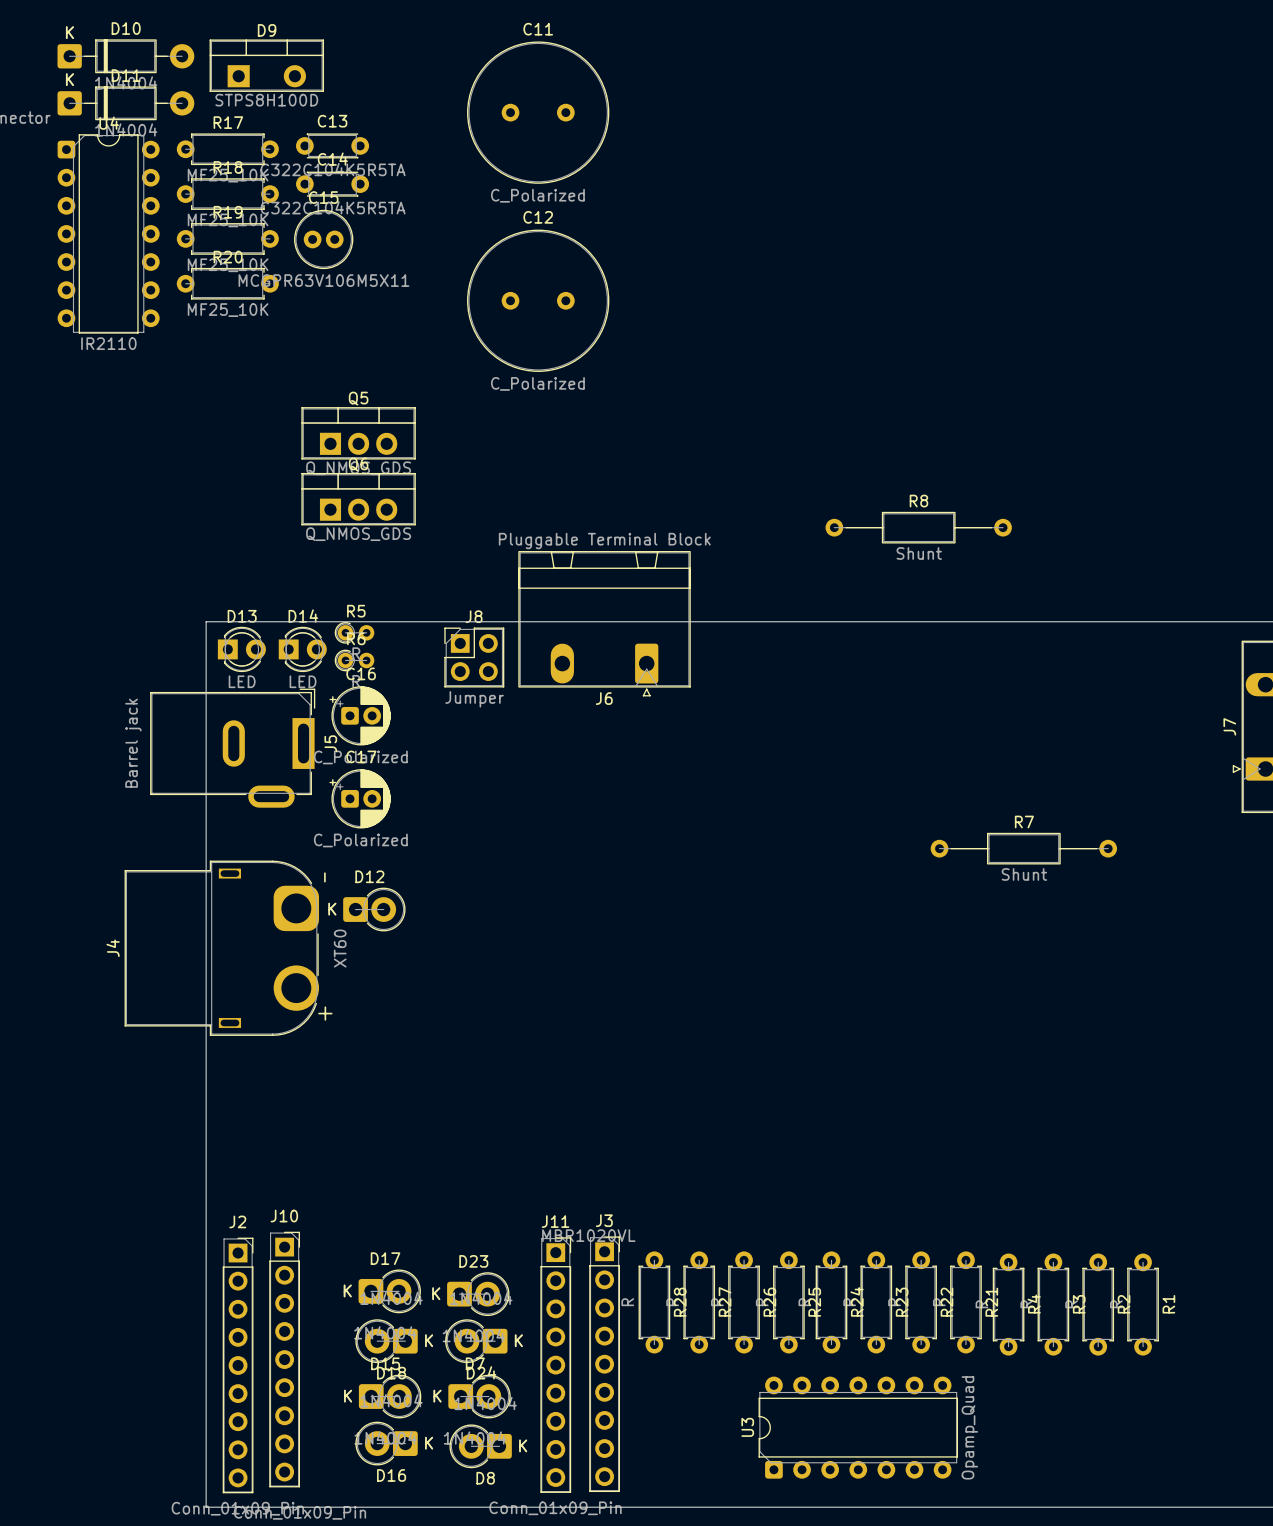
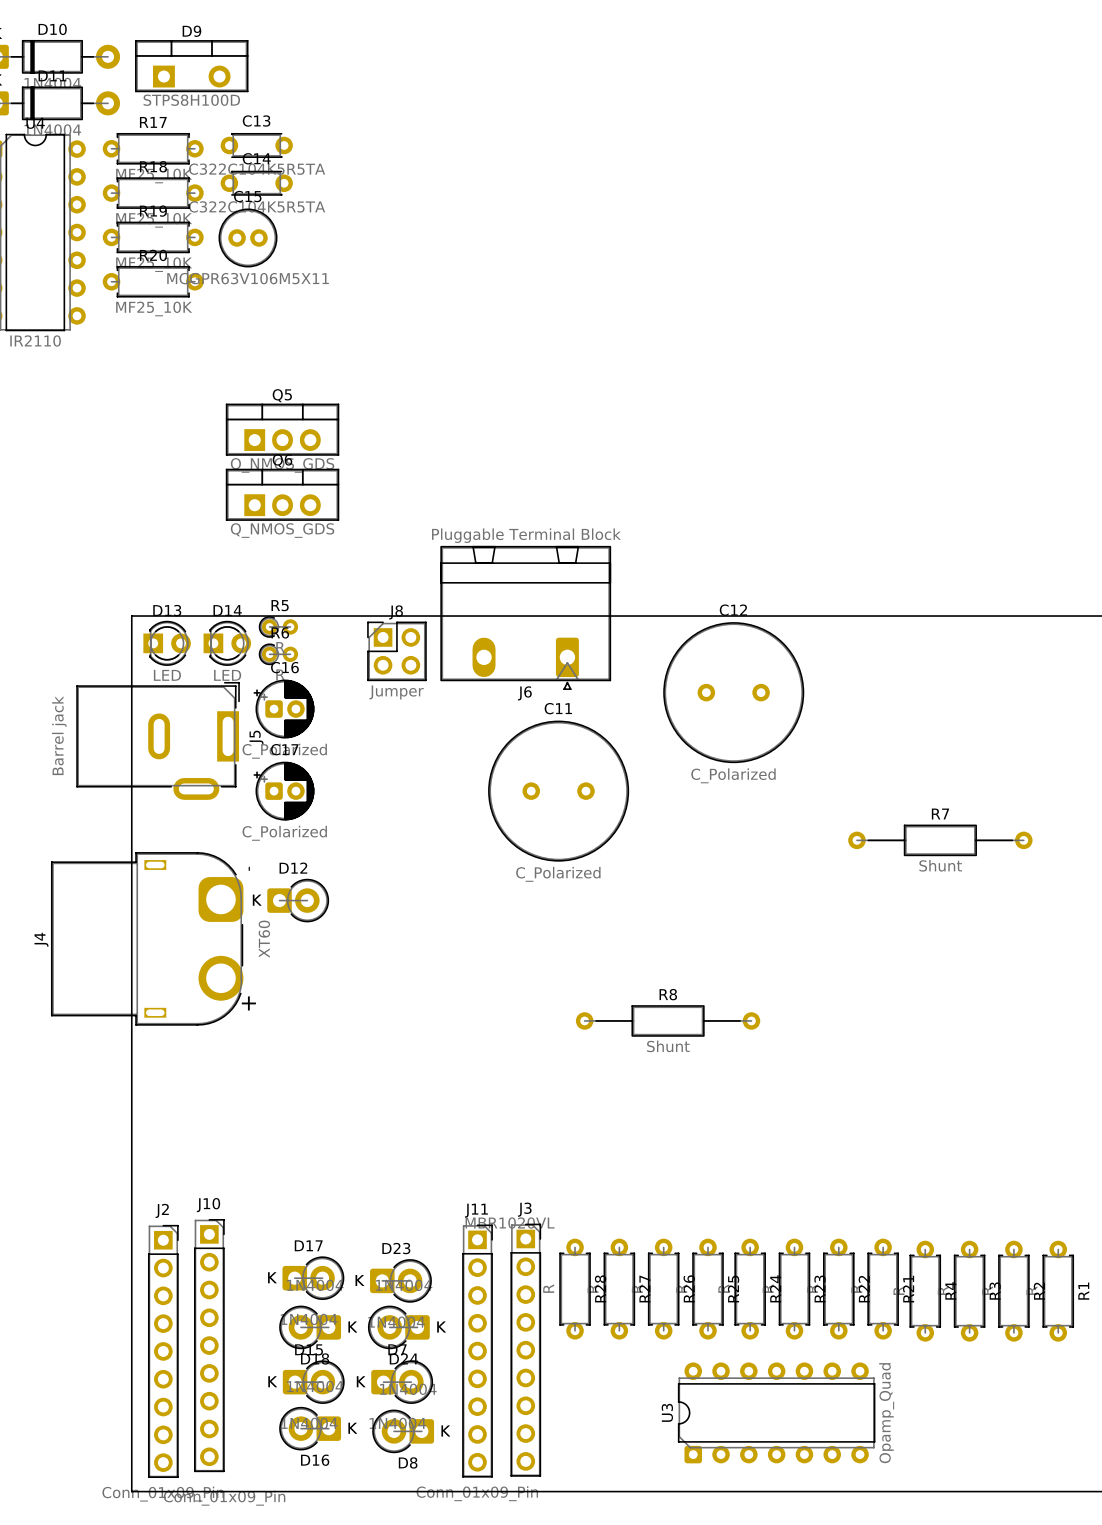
C11 position: (538, 112) -> (558, 791)
C12 position: (538, 300) -> (733, 692)
R8 position: (918, 527) -> (668, 1020)

